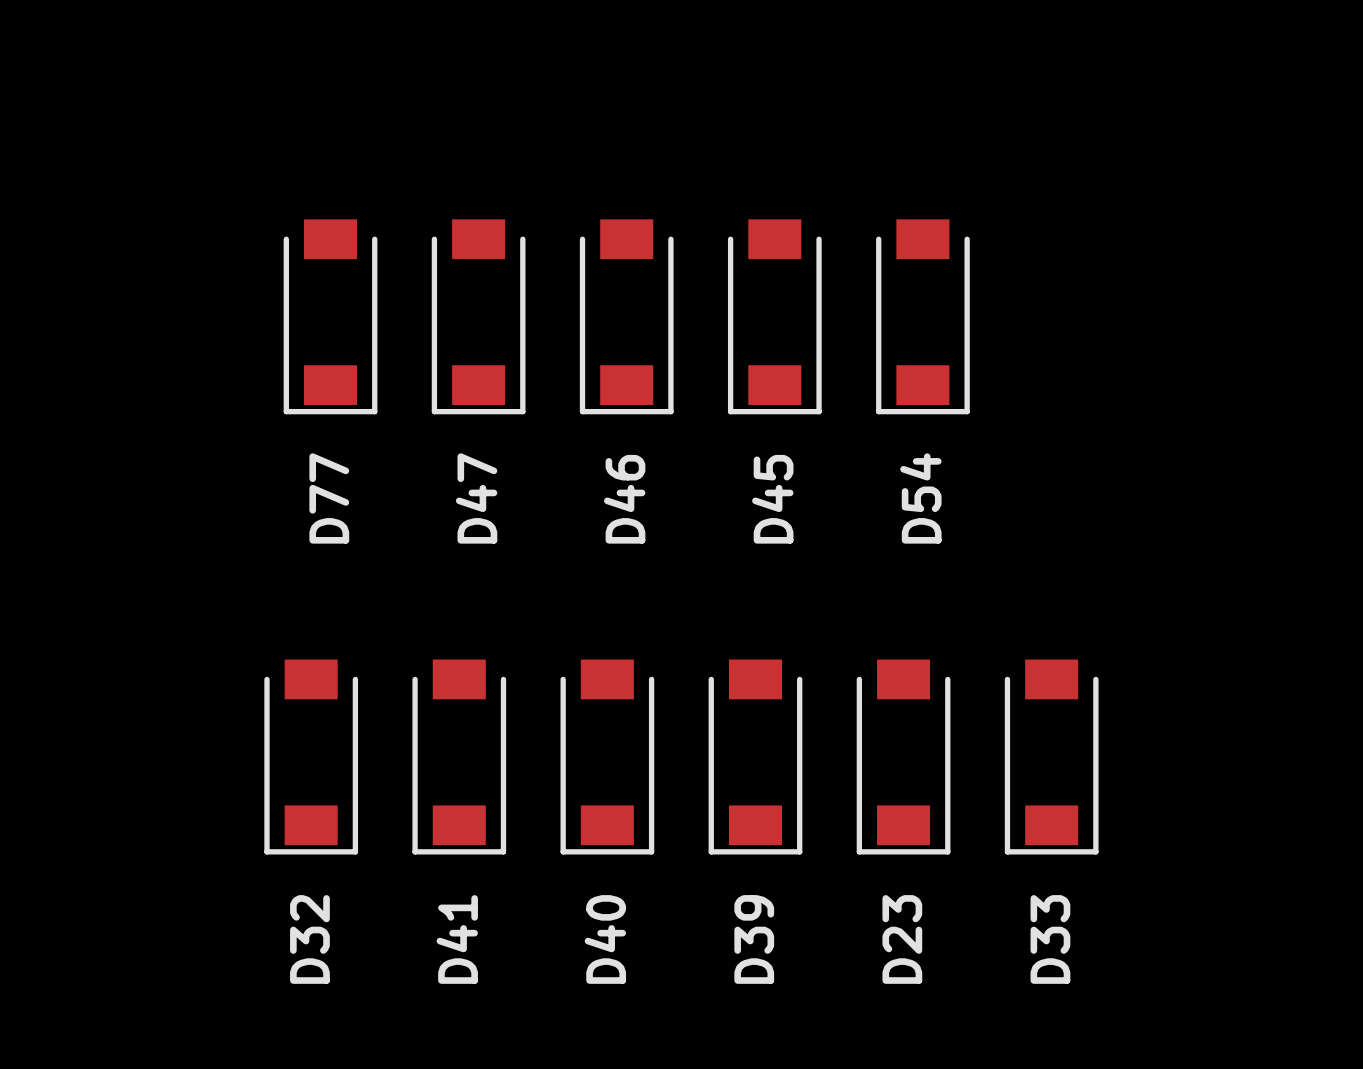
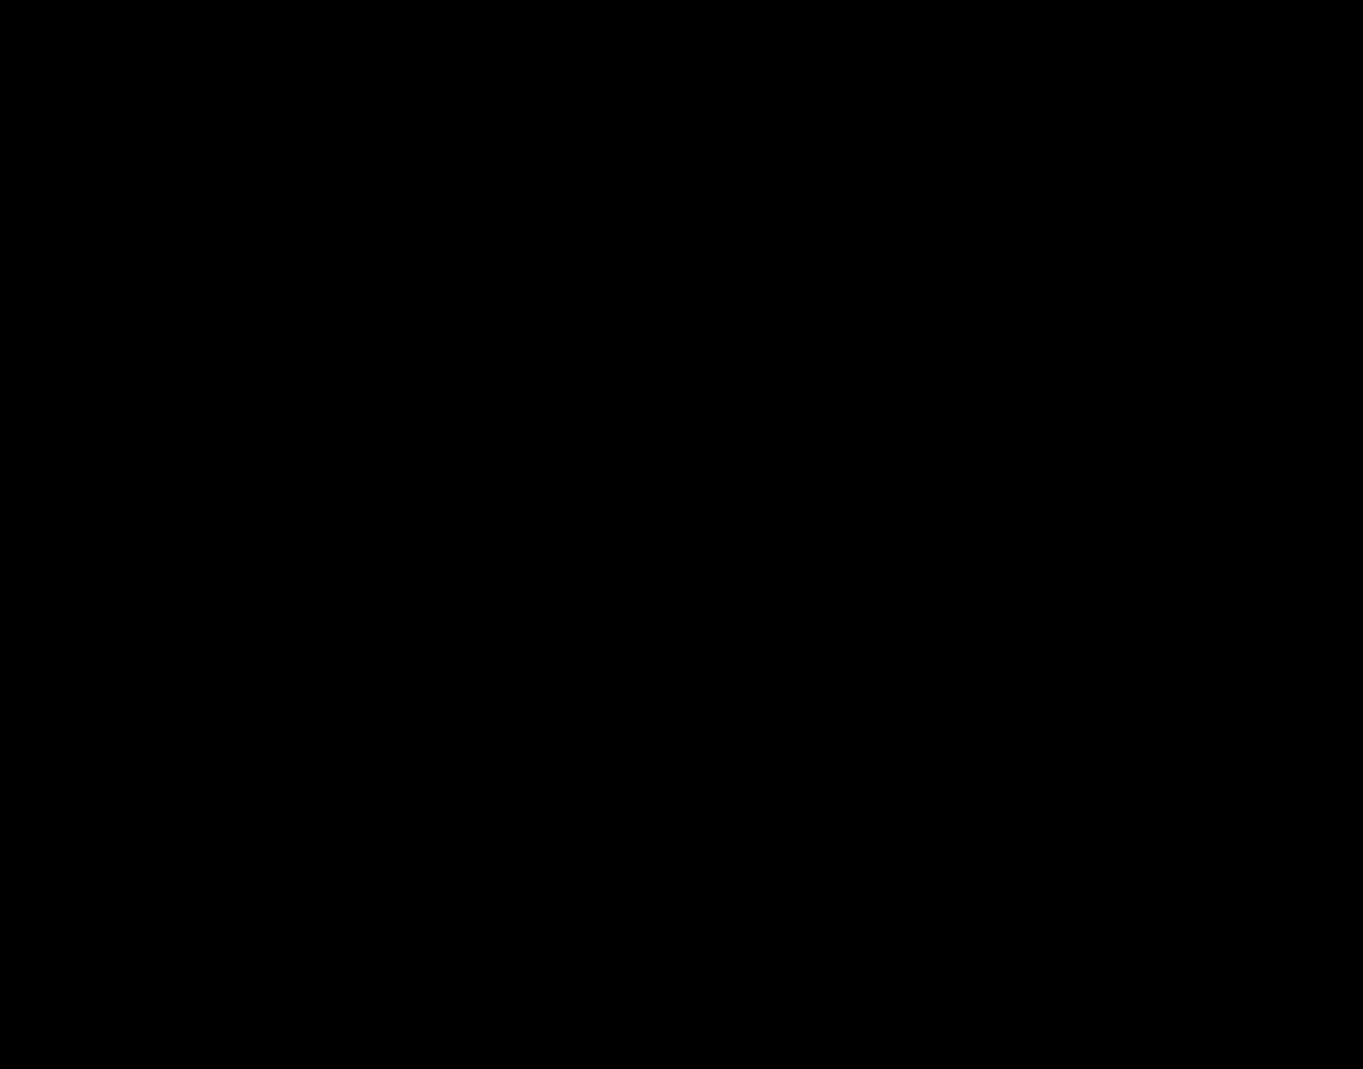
D77: (330, 316) -> none
D47: (478, 316) -> none
D46: (626, 316) -> none
D45: (774, 316) -> none
D54: (922, 316) -> none
D32: (311, 757) -> none
D41: (459, 757) -> none
D40: (607, 757) -> none
D39: (755, 757) -> none
D23: (903, 757) -> none
D33: (1051, 757) -> none

